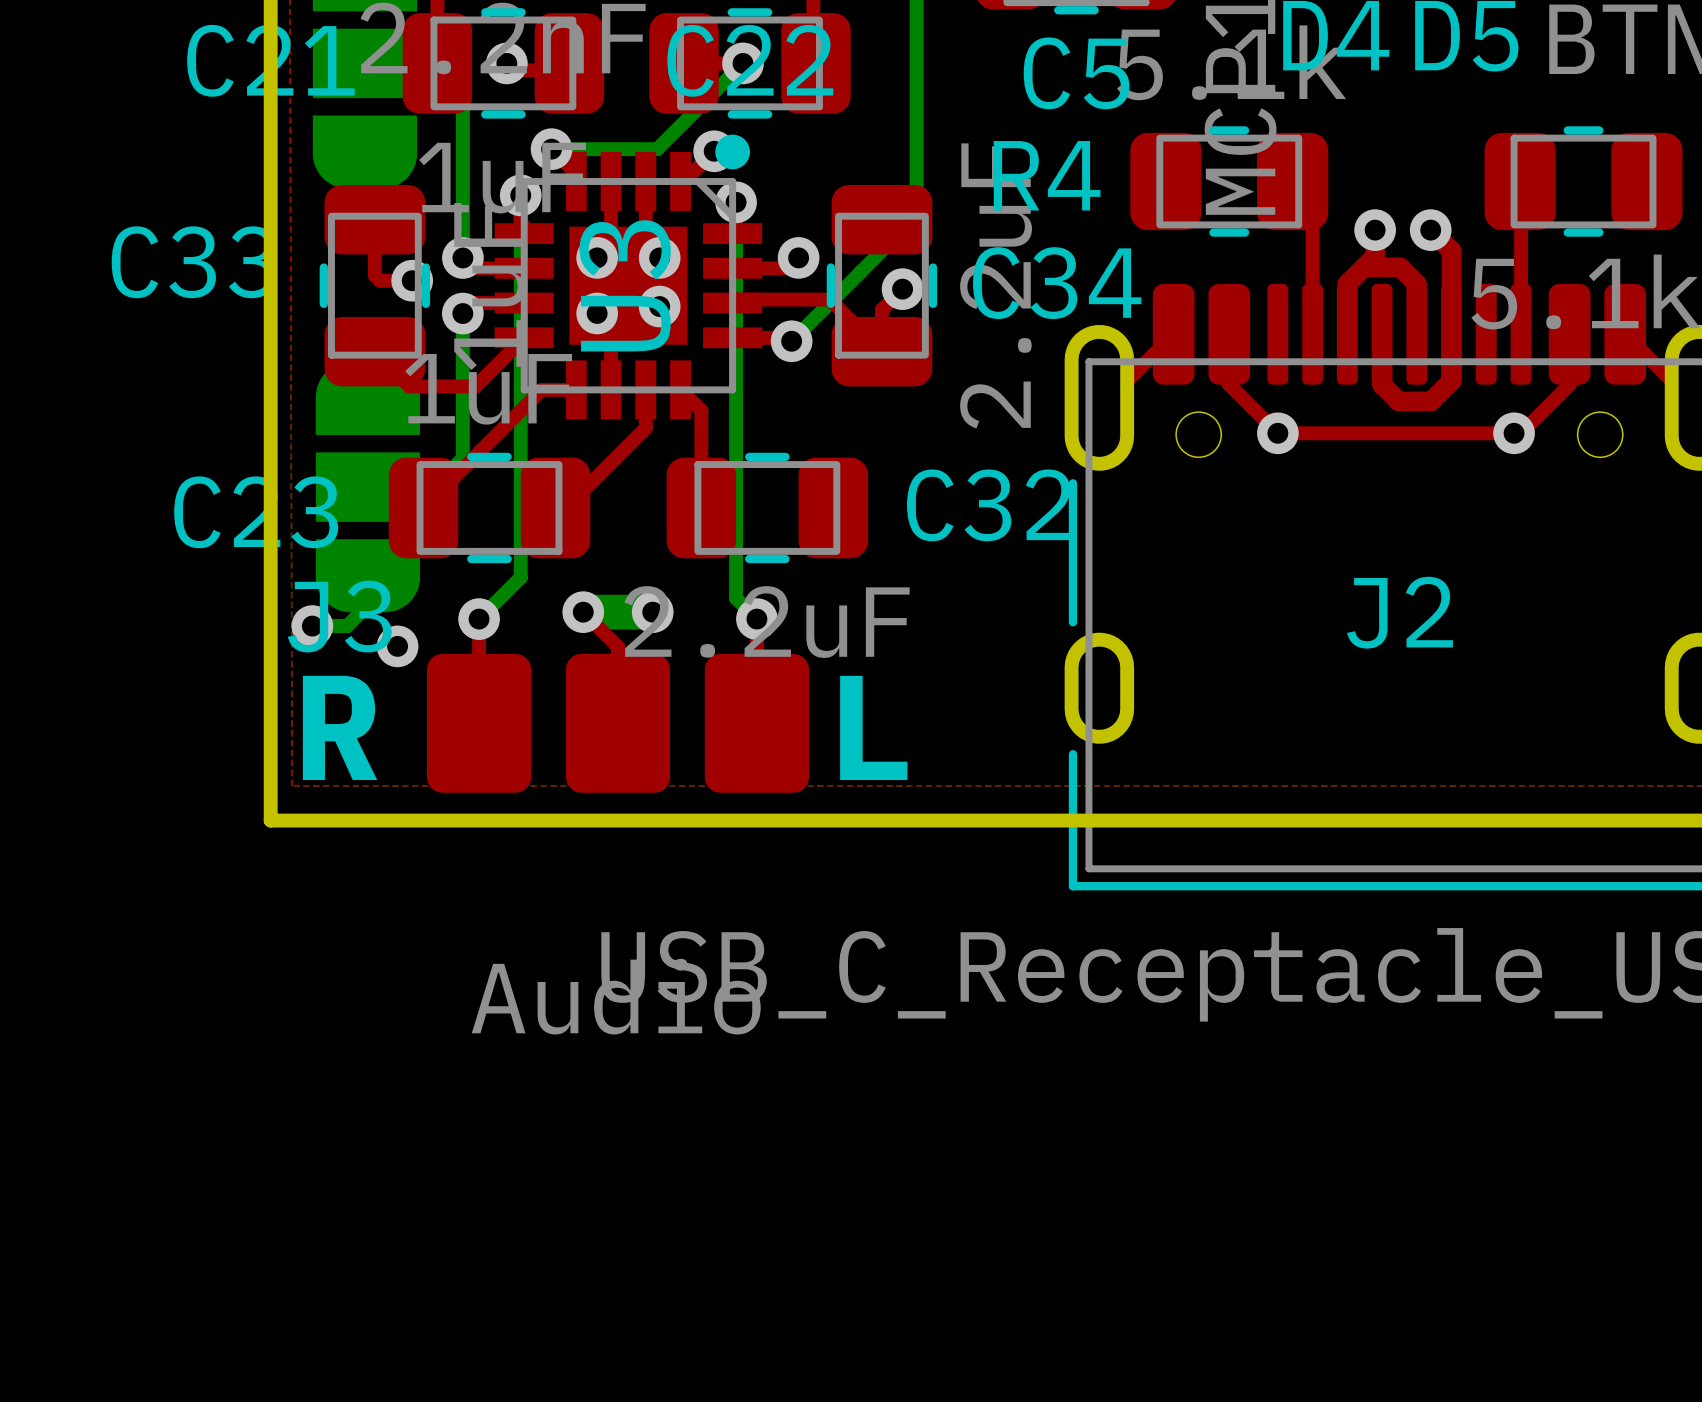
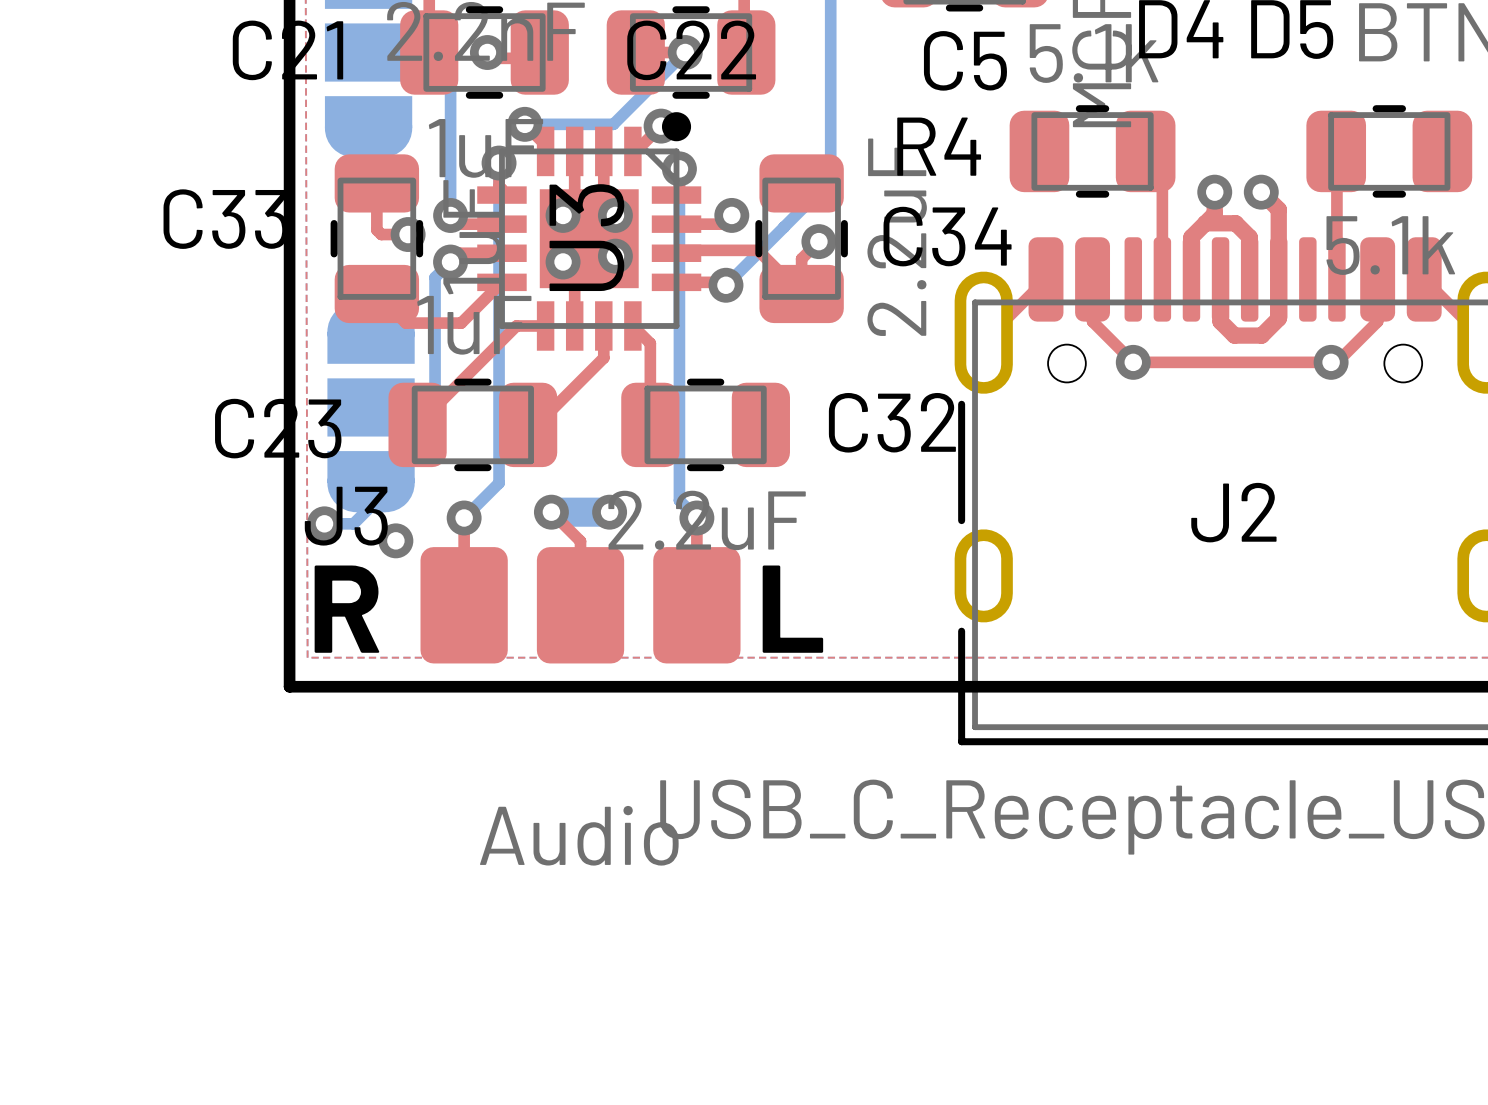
bottom track: (462, 313) (462, 458) (444, 476) -> (450, 262) (435, 277) (435, 398)

